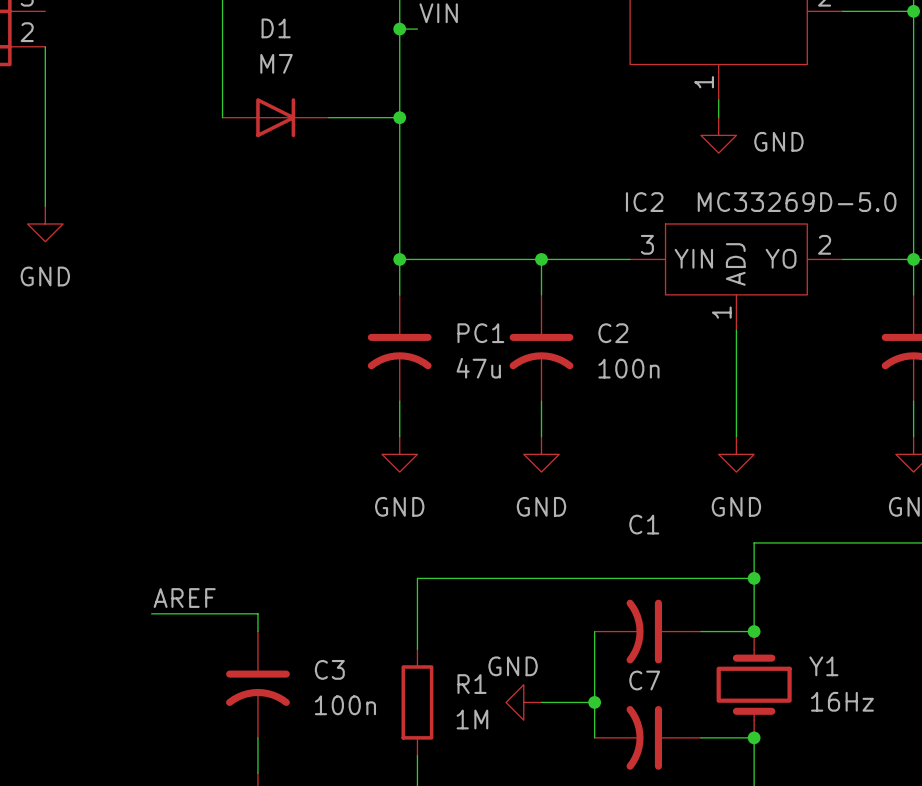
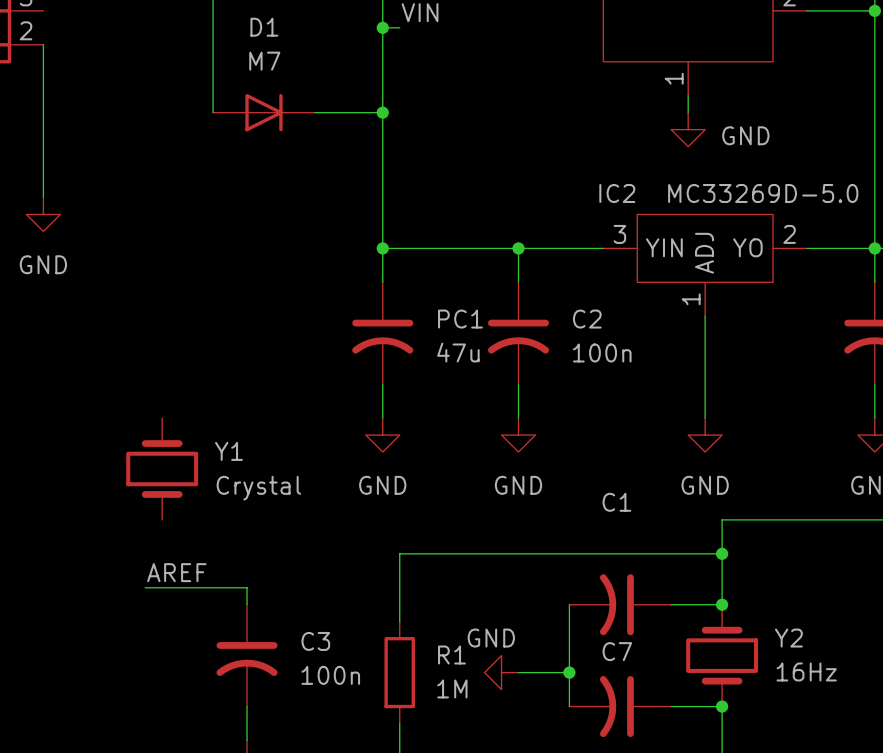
Y1: none -> Crystal (162, 469)
Y1 name: Y1 (823, 666) -> Y2 (788, 638)

